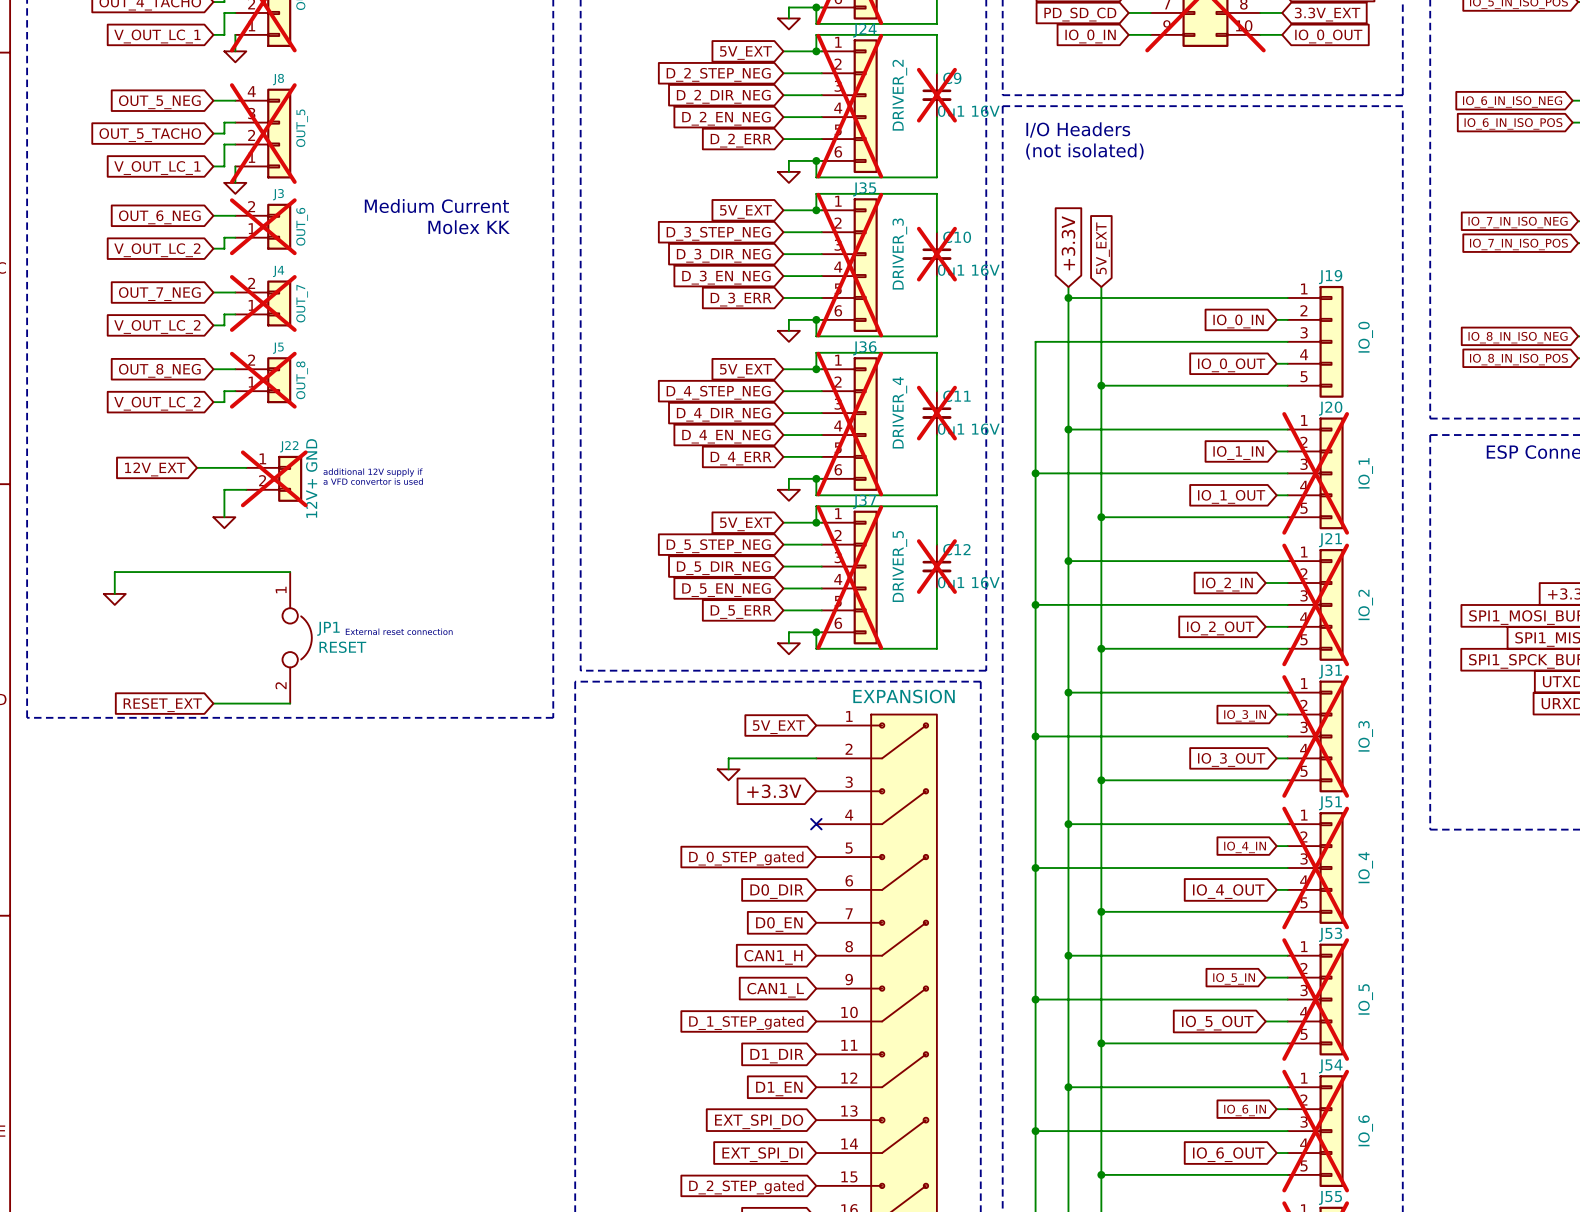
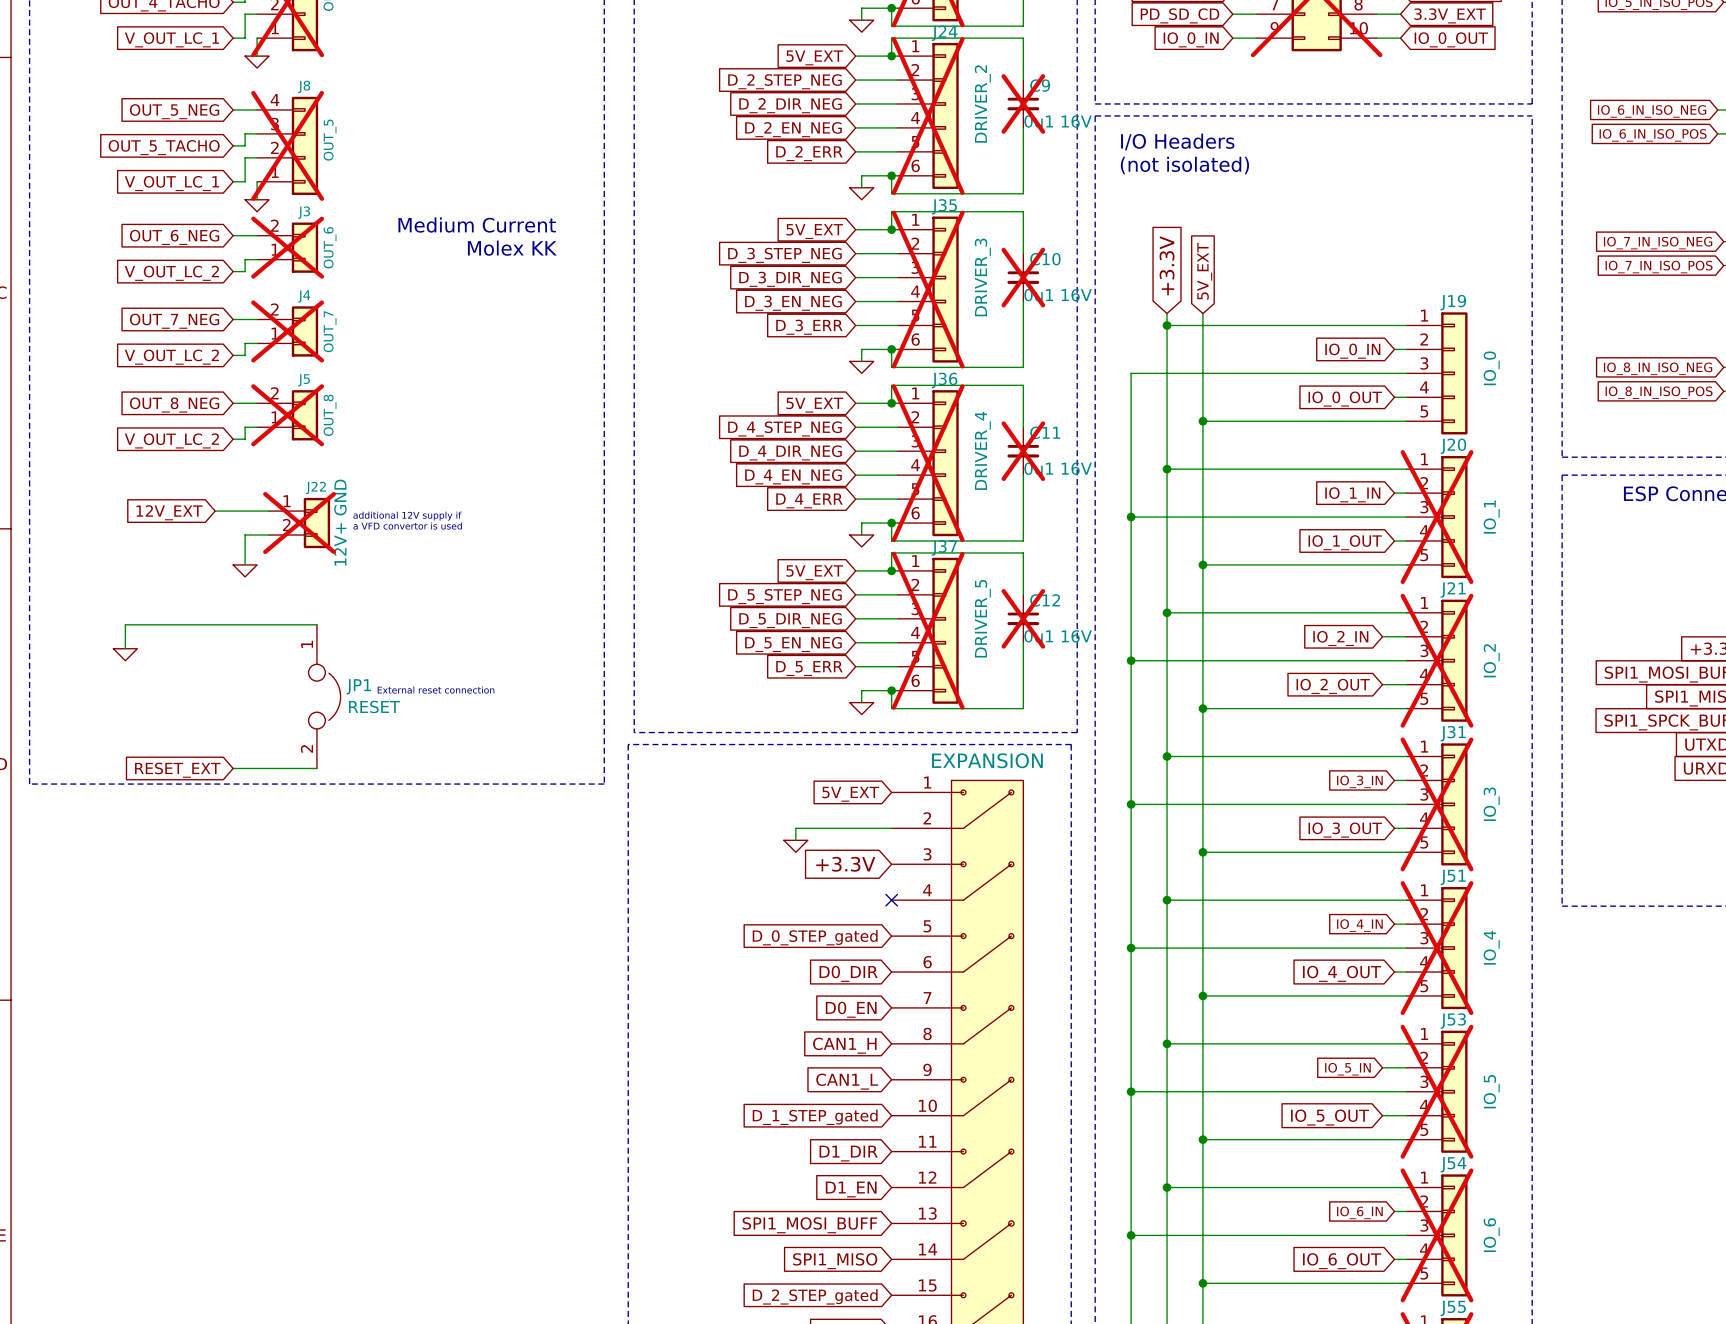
global label: EXT_SPI_DO (759, 1121) -> SPI1_MOSI_BUFF (809, 1225)
global label: EXT_SPI_DI (762, 1154) -> SPI1_MISO (835, 1261)

